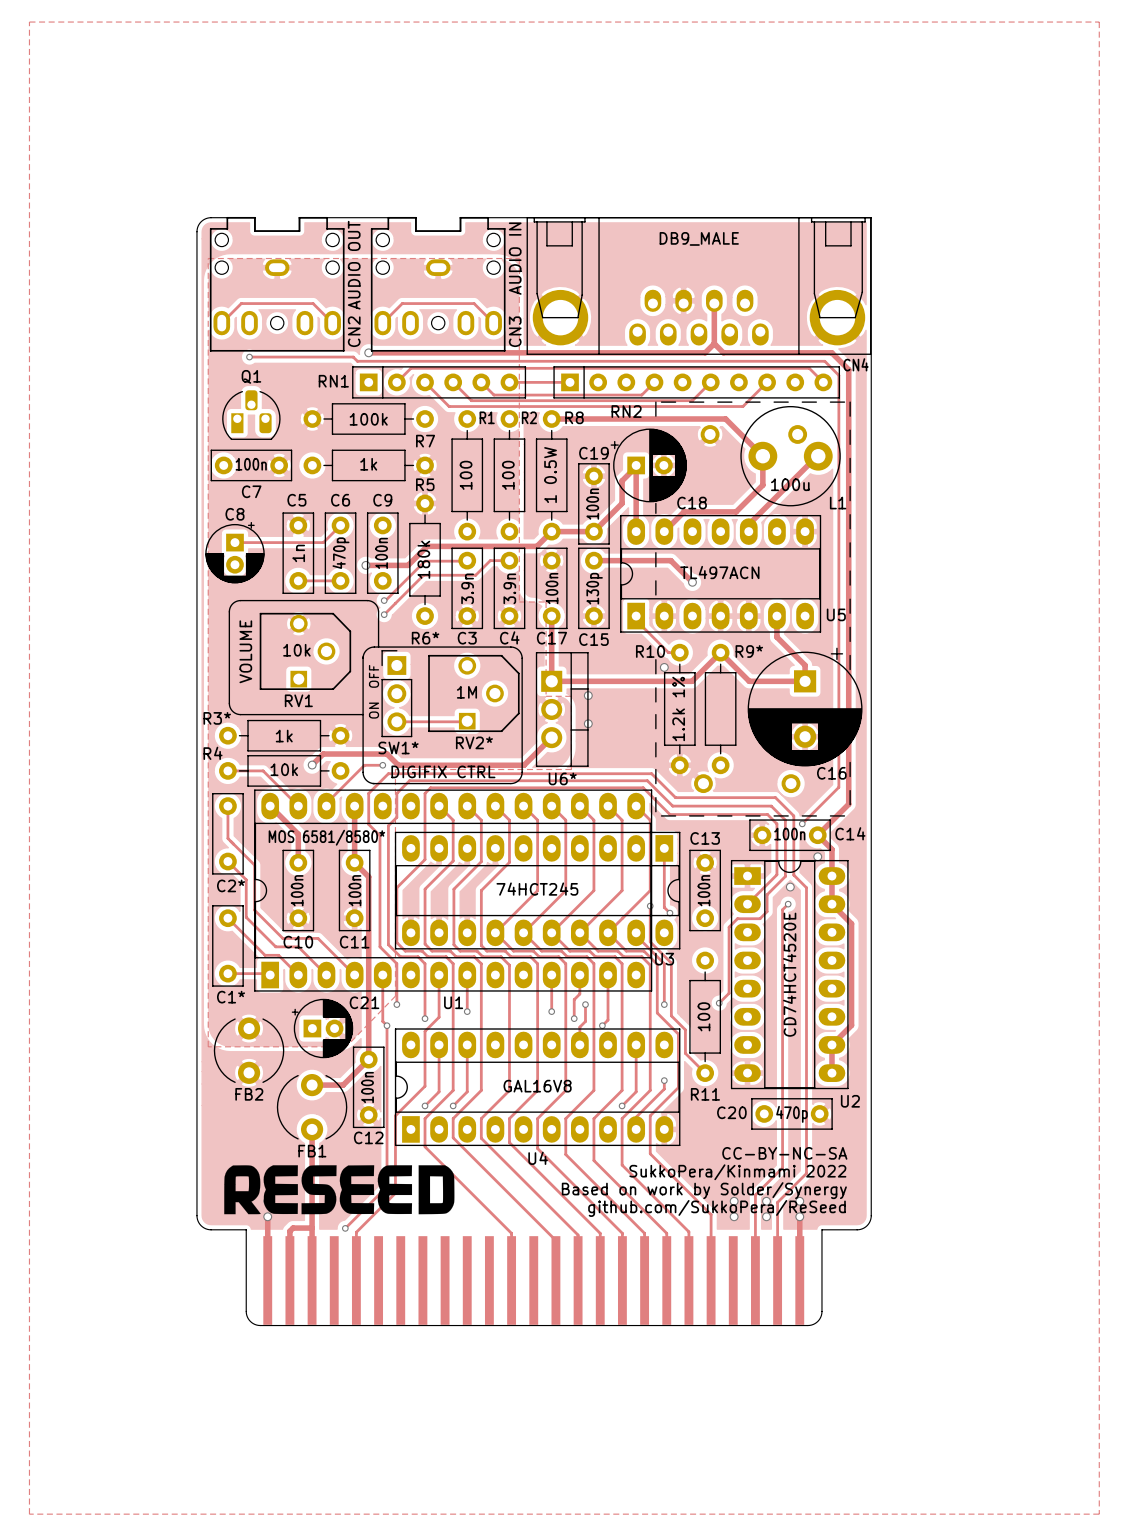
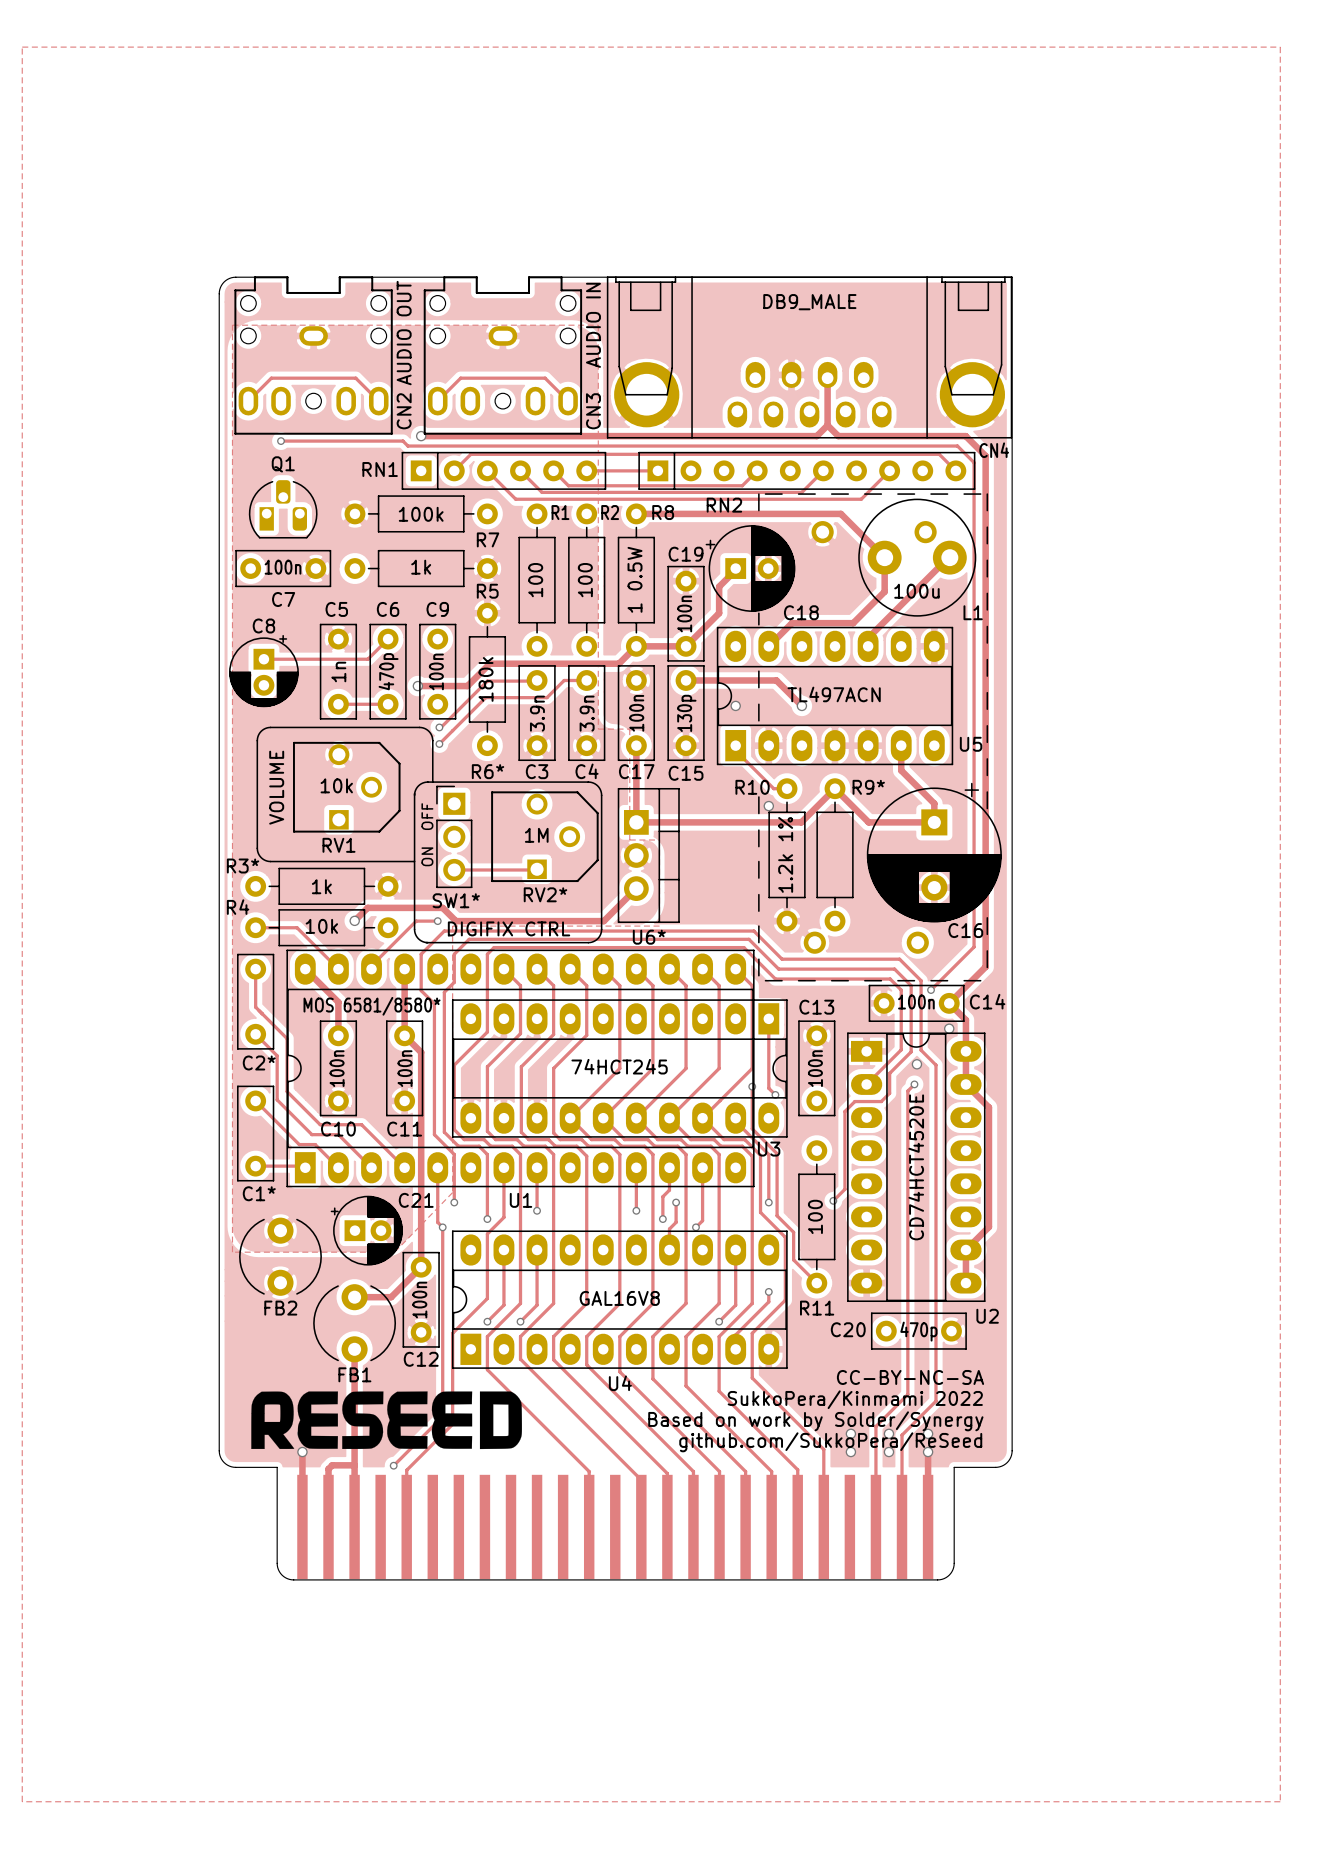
track: (636, 466) (636, 531) -> none
via: none -> (735, 705)
via: (588, 695) -> none
via: (588, 723) -> none

